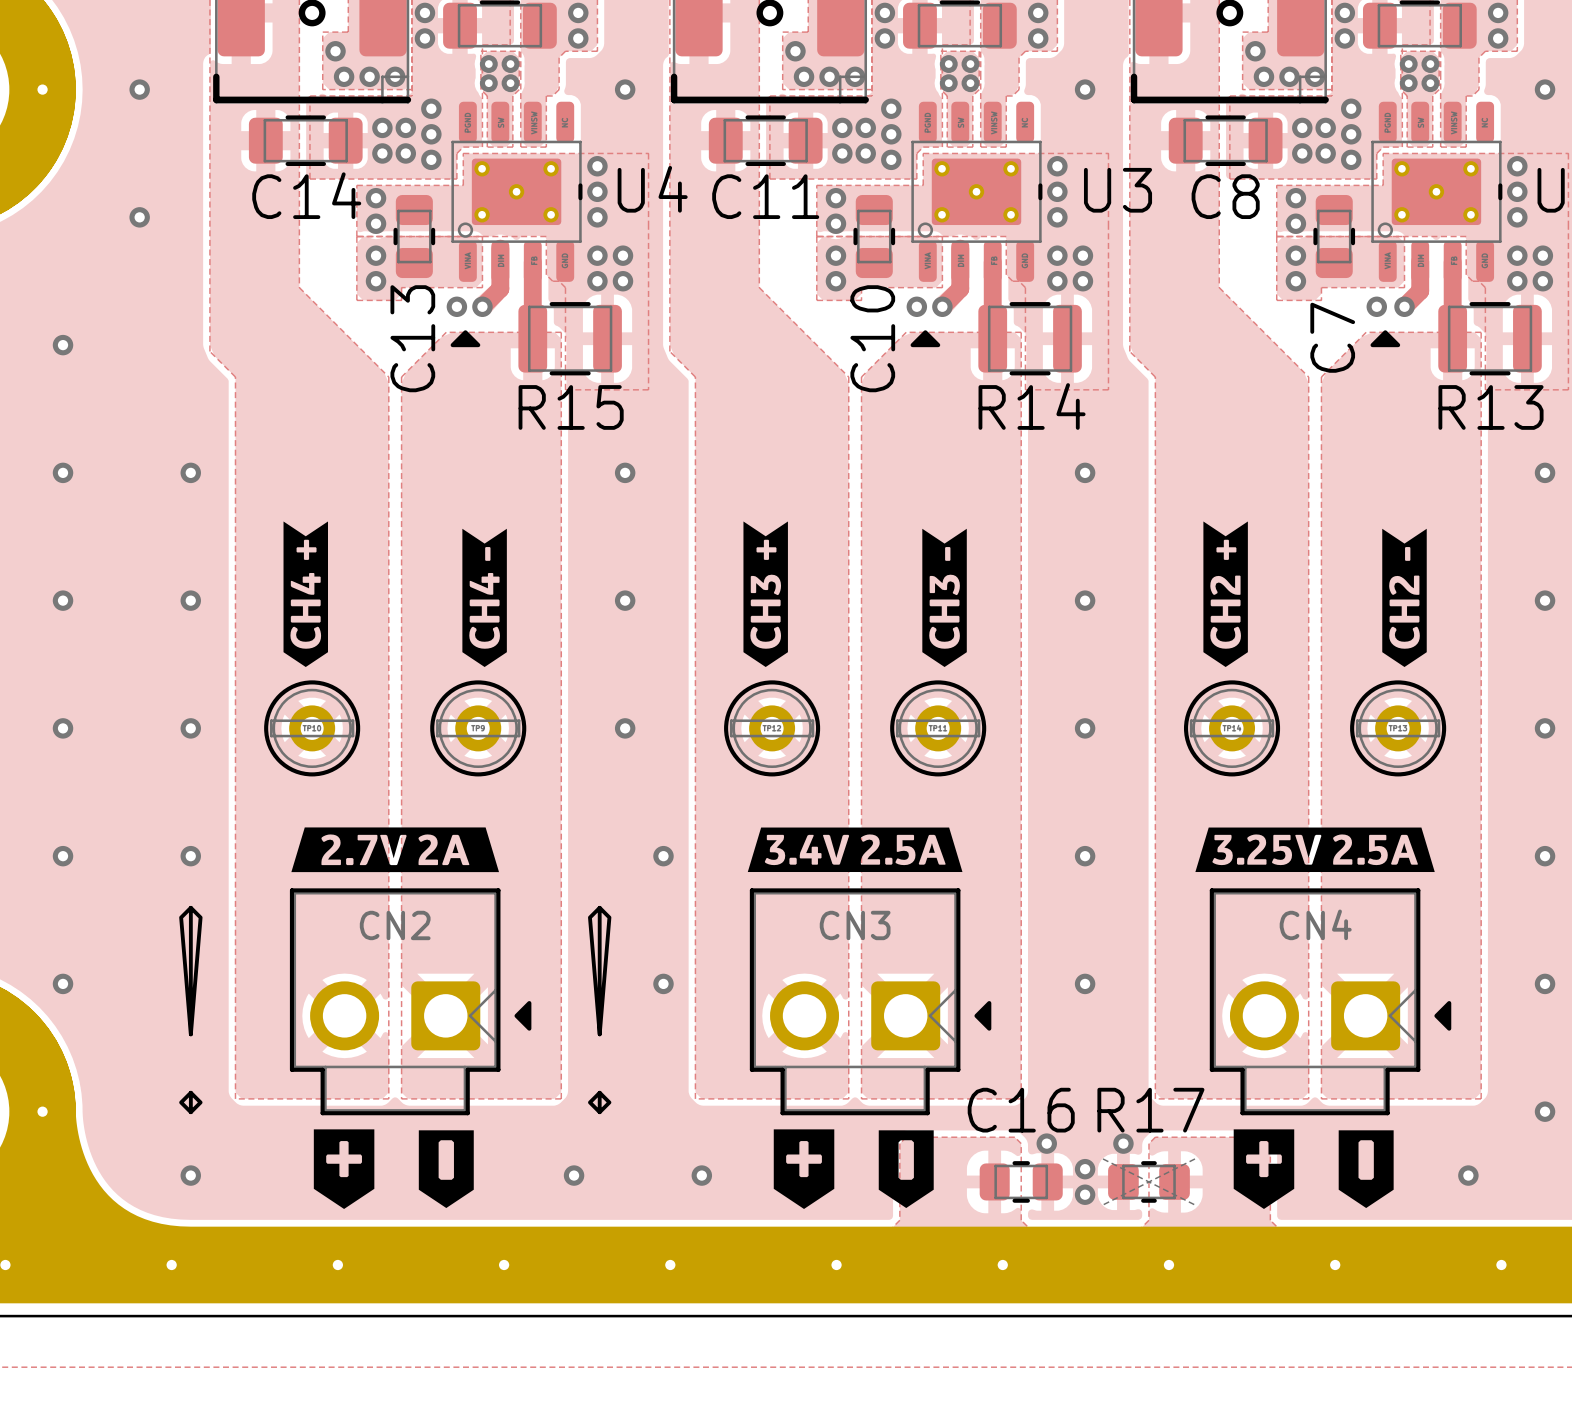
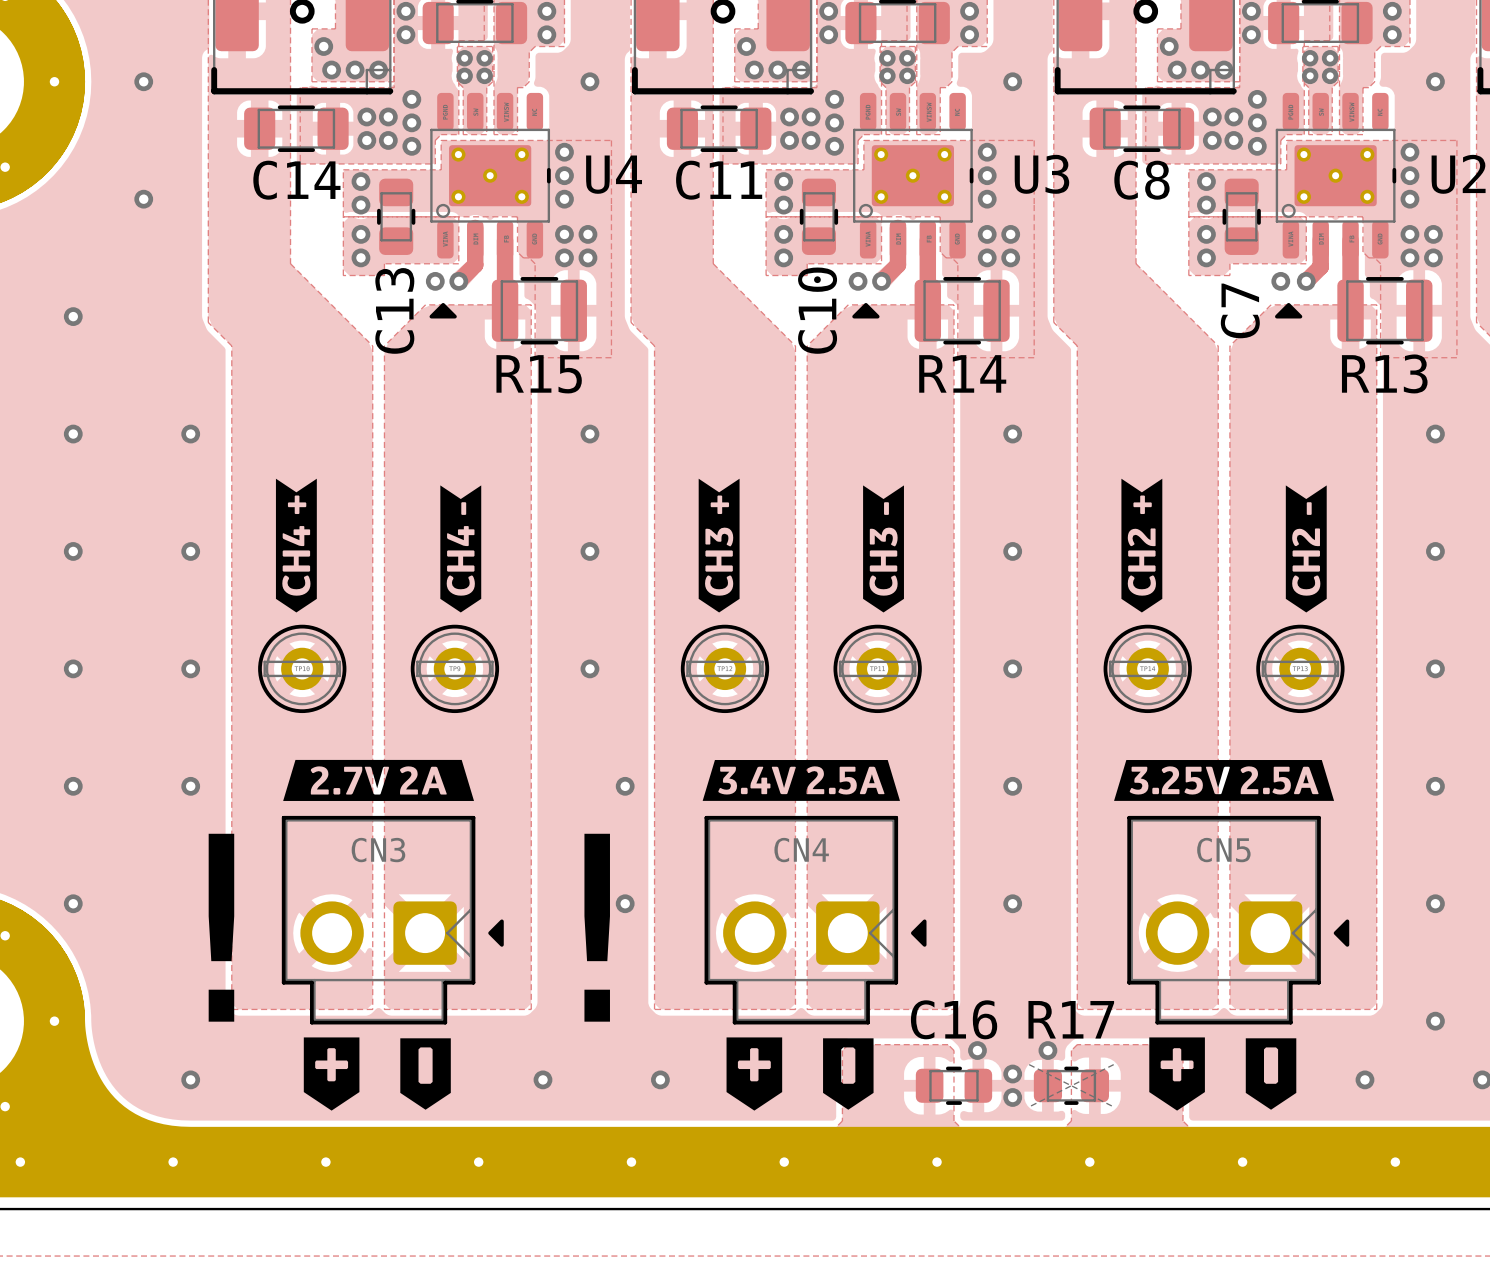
CN4 name: CN4 (1315, 924) -> CN5 (1223, 850)
CN2 name: CN2 (395, 925) -> CN3 (378, 850)
CN3 name: CN3 (855, 925) -> CN4 (801, 850)

